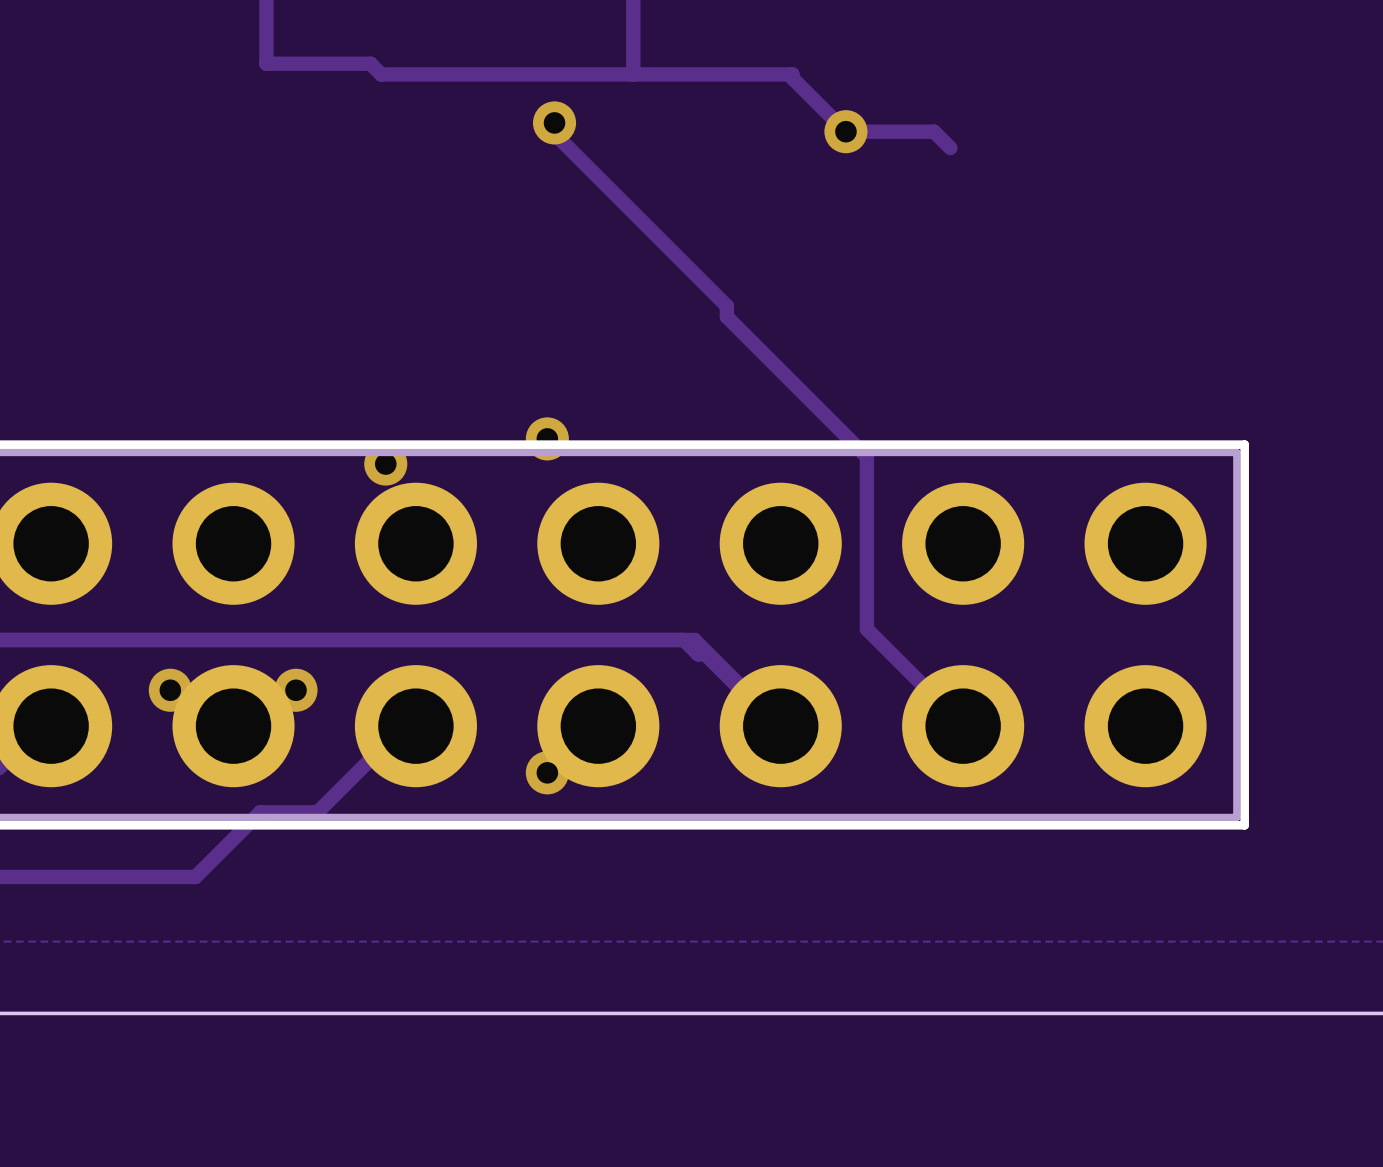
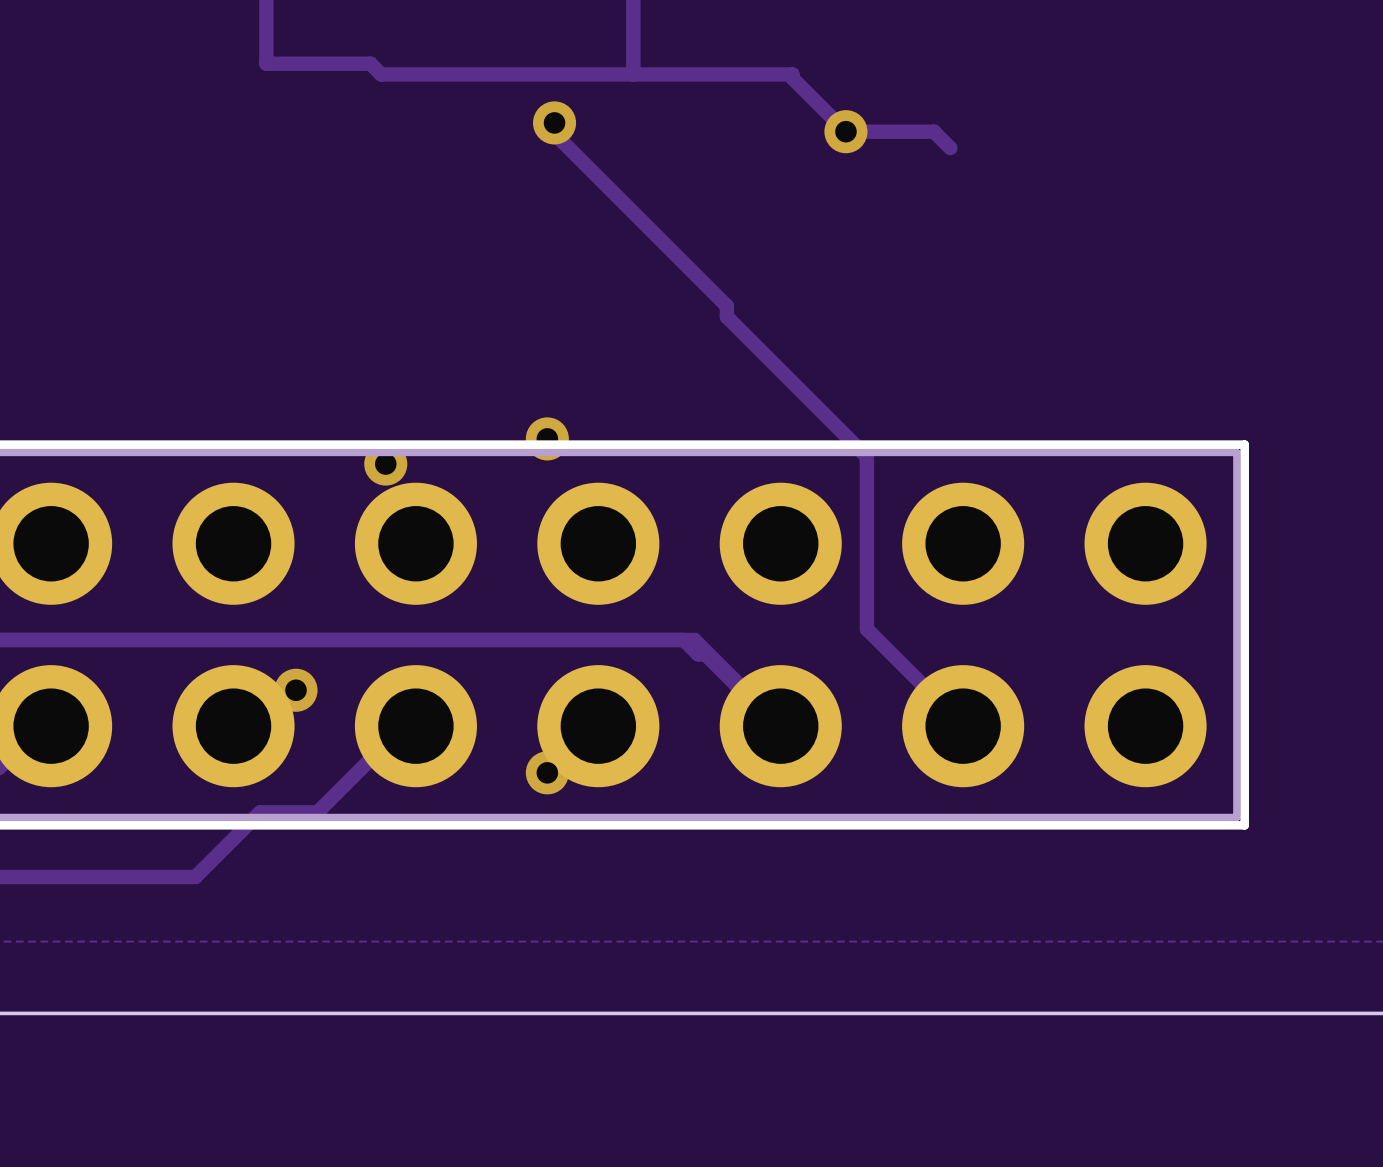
via: (170, 690) -> none

